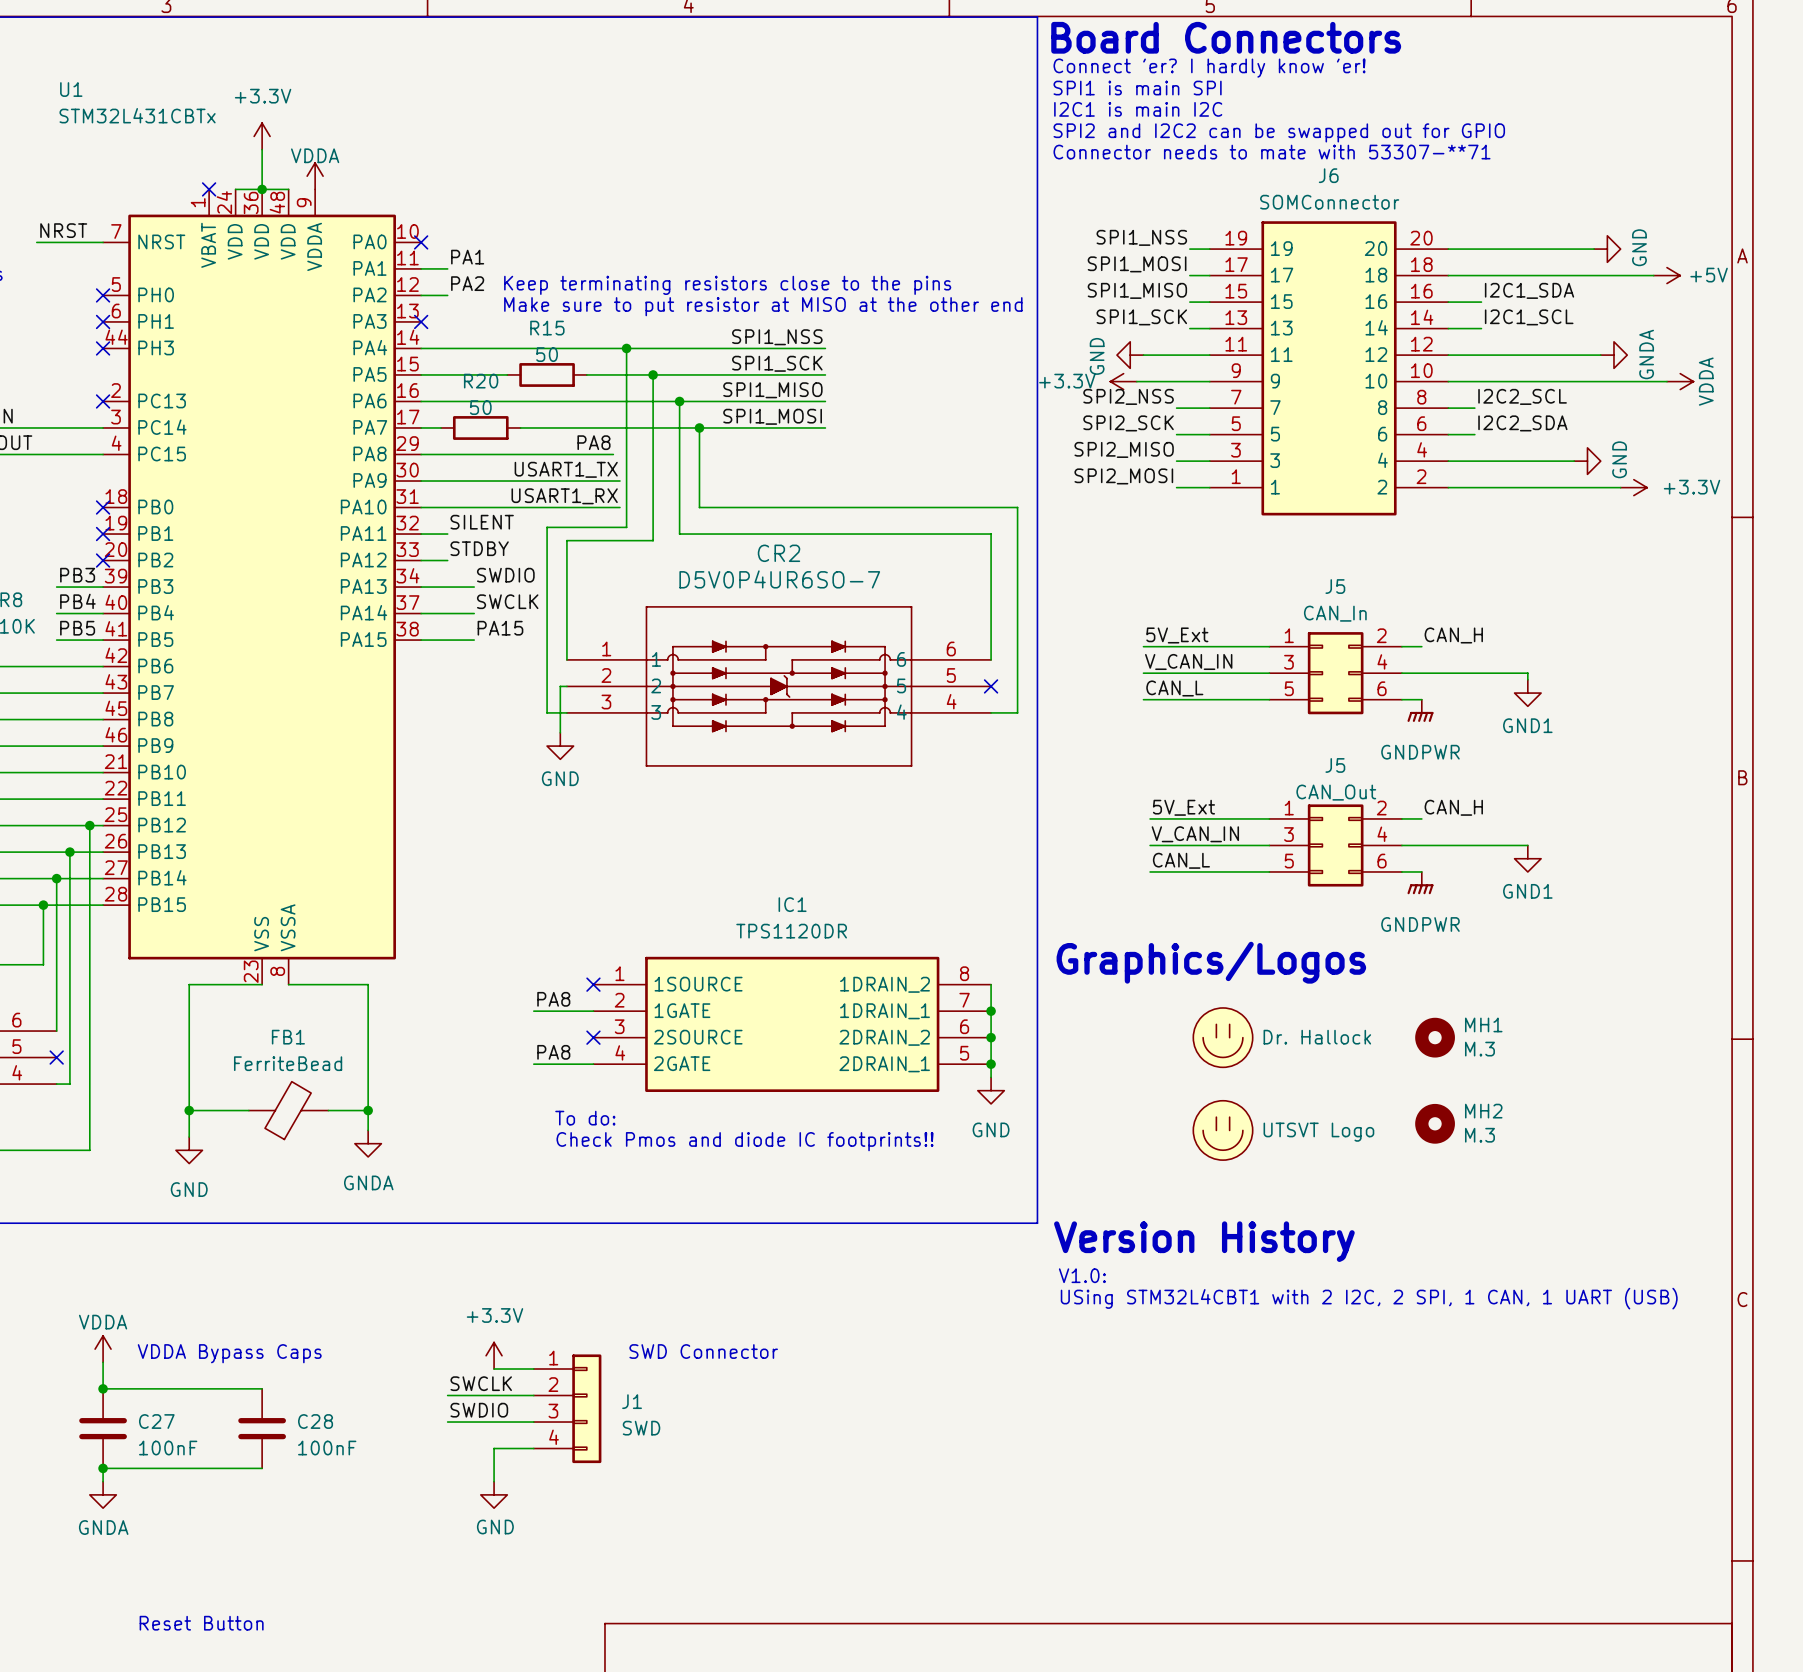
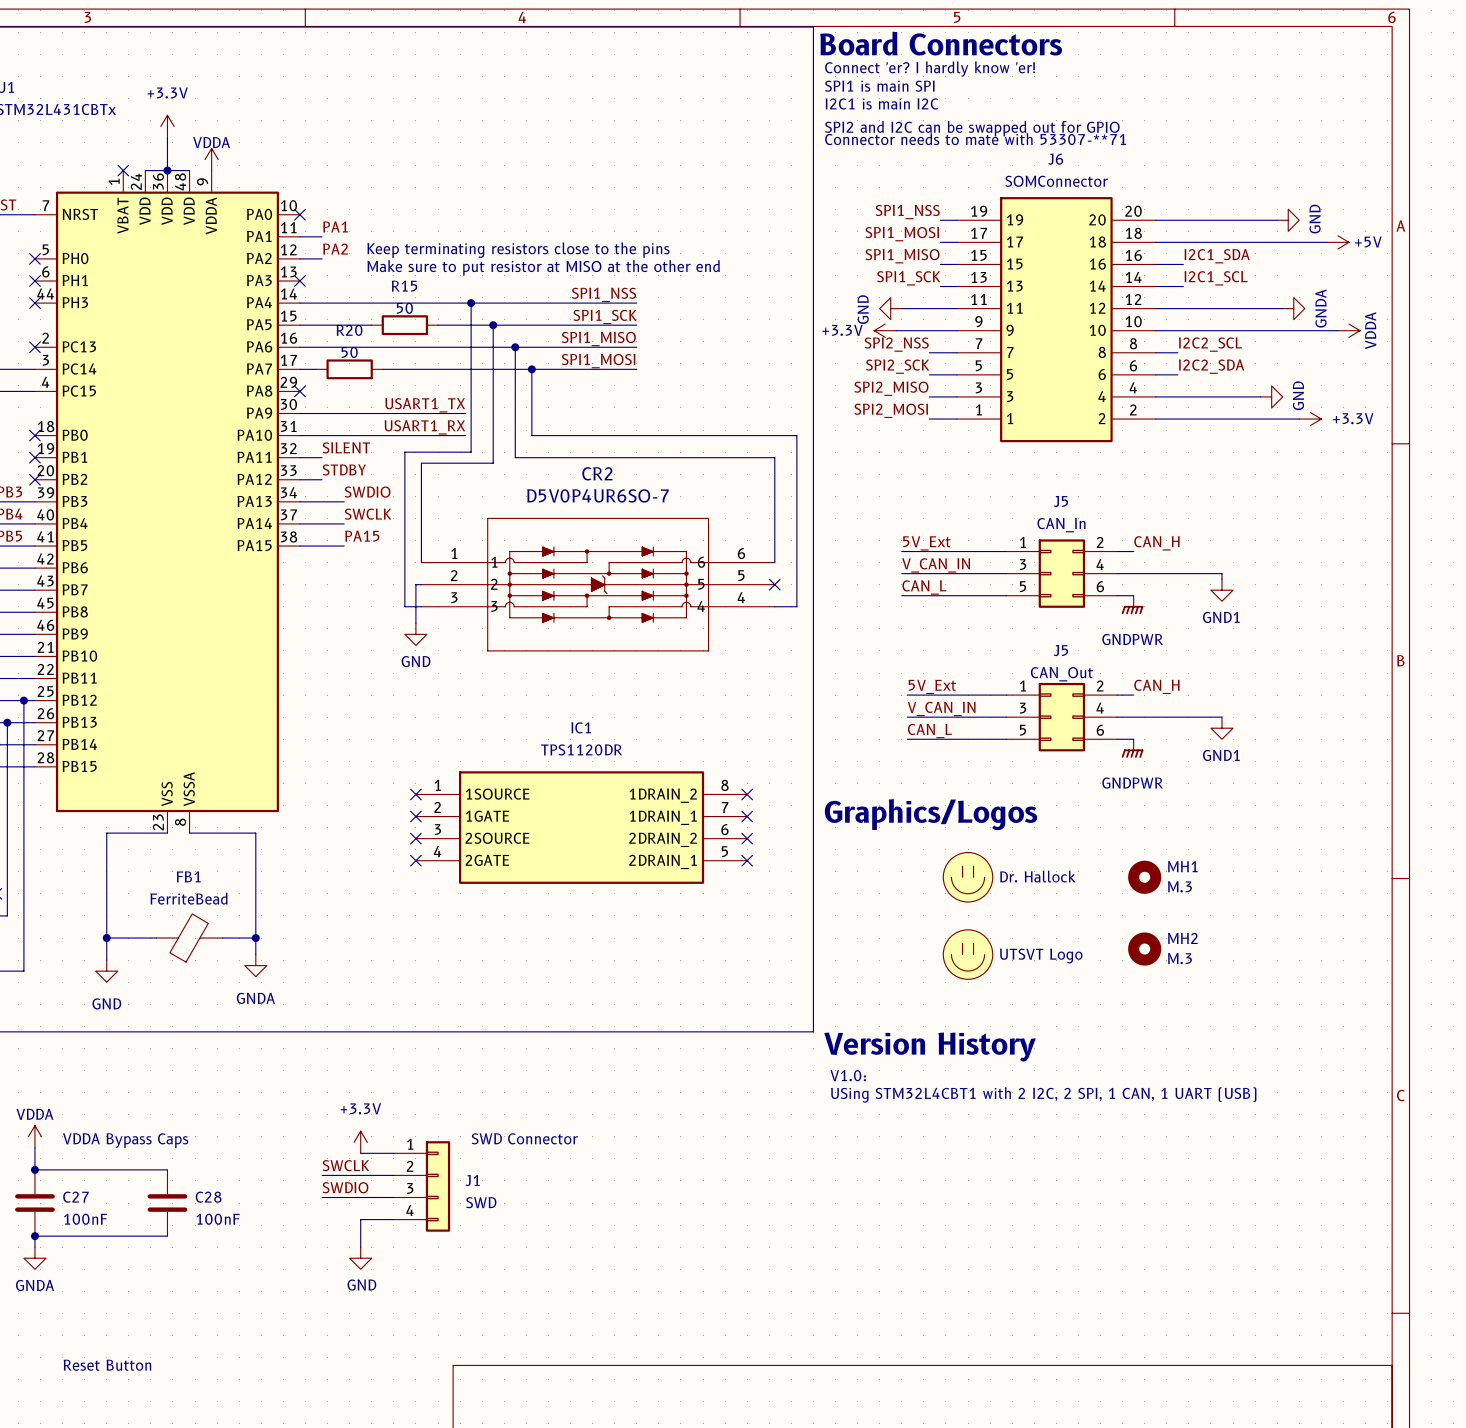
text: SPI2 and I2C2 can be swapped out for GPIO (1279, 132) -> SPI2 and I2C can be swapped out for GPIO (972, 128)
label: PA8 (593, 442) -> none
wire: (421, 454) (613, 454) -> none
no-connect mark: none -> (299, 391)
no-connect mark: none -> (415, 794)
no-connect mark: none -> (747, 794)
no-connect mark: none -> (415, 816)
no-connect mark: none -> (747, 816)
no-connect mark: (593, 984) -> none
wire: (991, 984) (991, 1077) -> none
no-connect mark: none -> (415, 838)
no-connect mark: none -> (747, 838)
label: PA8 (553, 999) -> none
wire: (533, 1011) (593, 1011) -> none
junction: (991, 1011) -> none
no-connect mark: none -> (415, 860)
no-connect mark: none -> (747, 860)
IC1 position: (792, 1024) -> (581, 827)
no-connect mark: (593, 1037) -> none
junction: (991, 1037) -> none
label: PA8 (553, 1052) -> none
wire: (533, 1064) (593, 1064) -> none
junction: (991, 1064) -> none
power symbol: GND (991, 1090) -> none
text: To do: (585, 1118) -> none
text: Check Pmos and diode IC footprints!! (745, 1141) -> none

